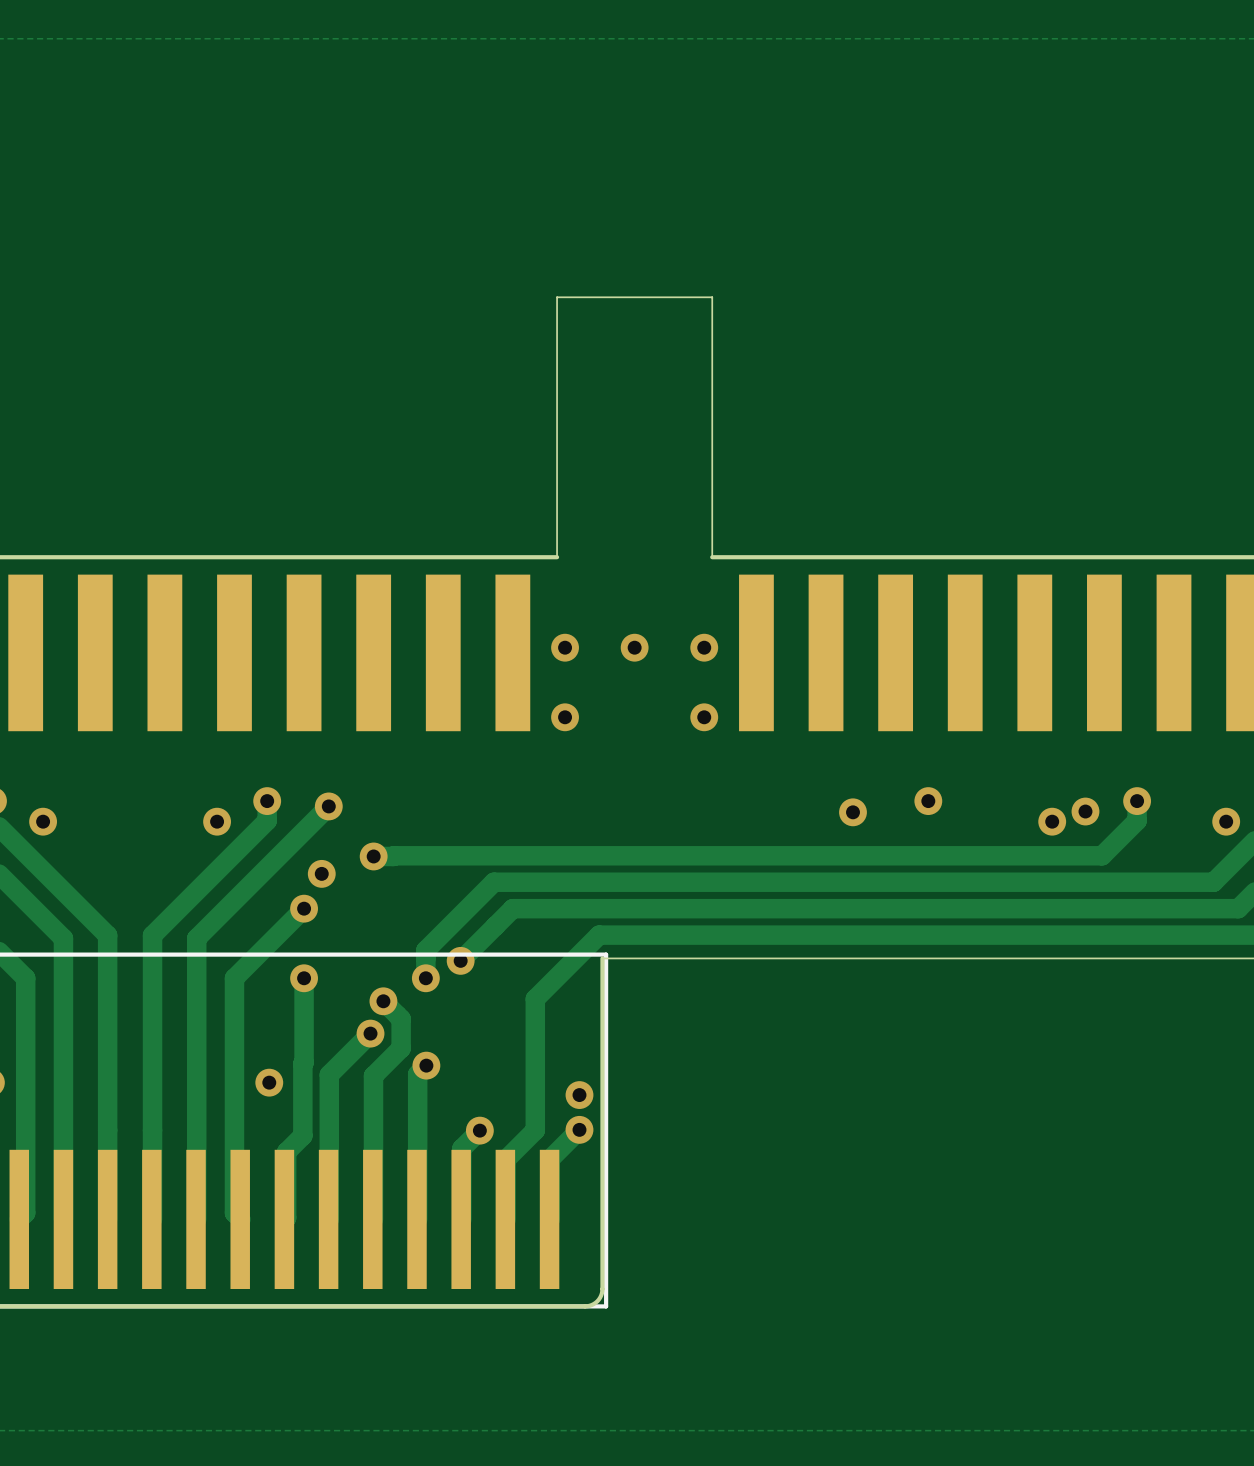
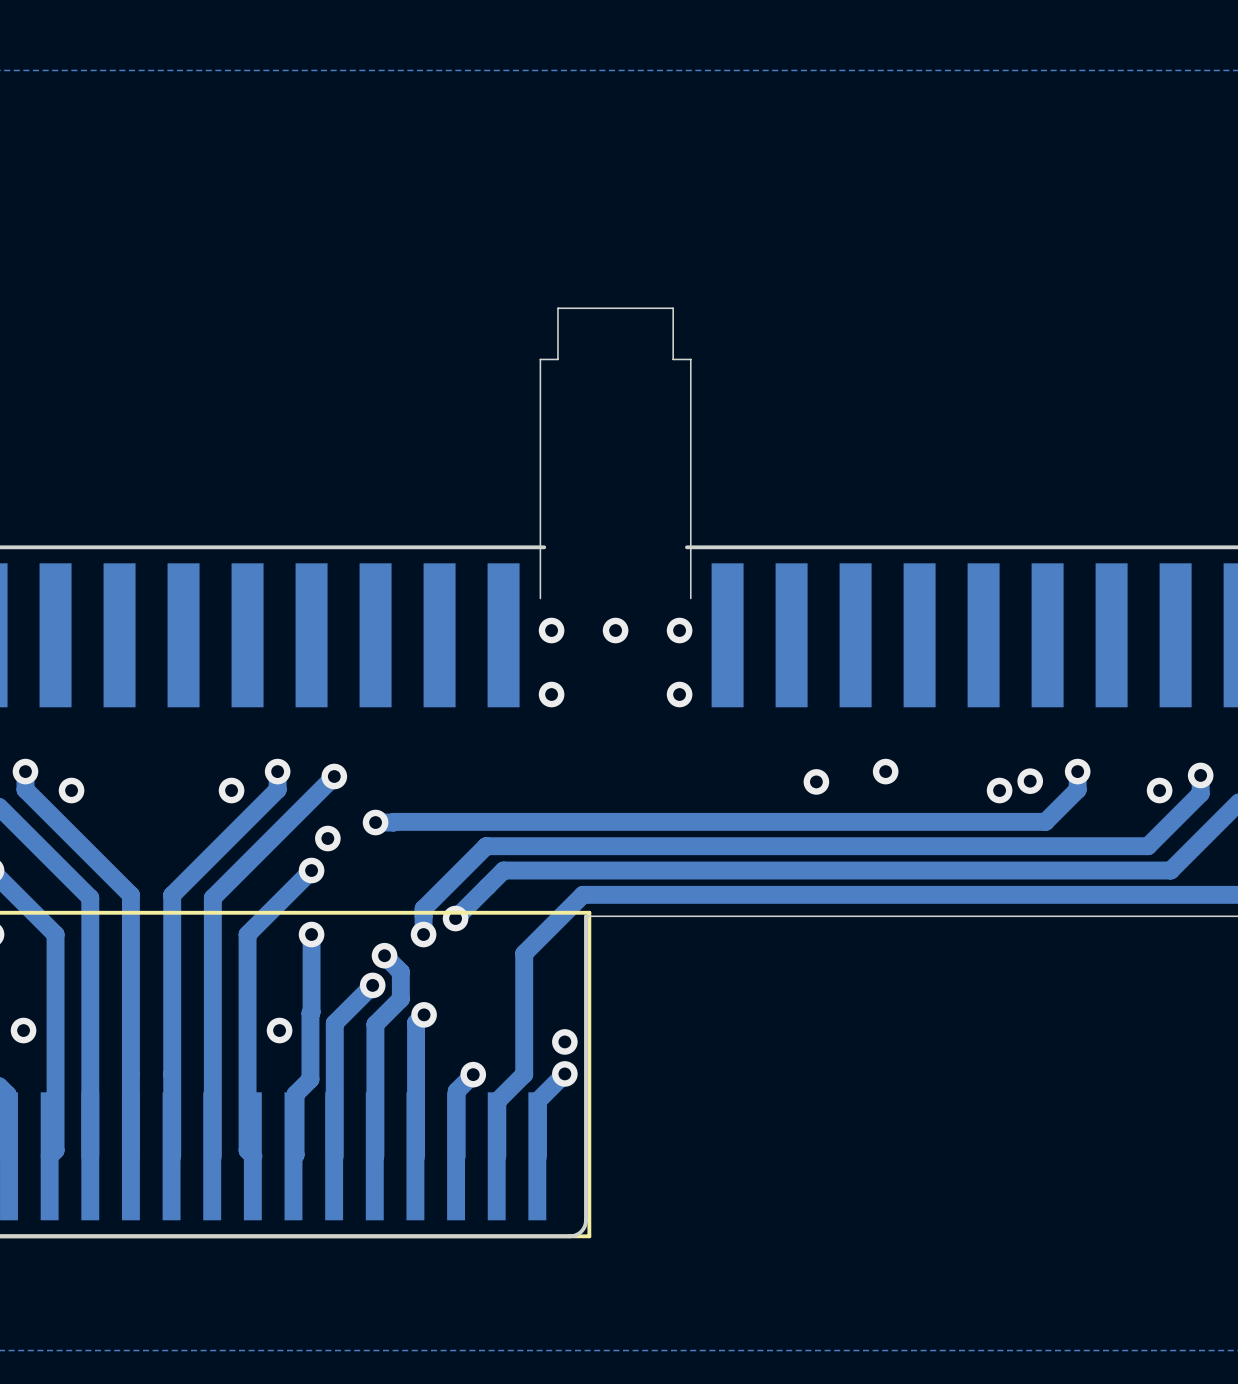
board edge: (572, 297) (557, 297) (557, 557) -> (557, 308) (557, 359) (540, 359) (540, 598)
board edge: (697, 297) (712, 297) (712, 557) -> (673, 308) (673, 359) (690, 359) (690, 598)

